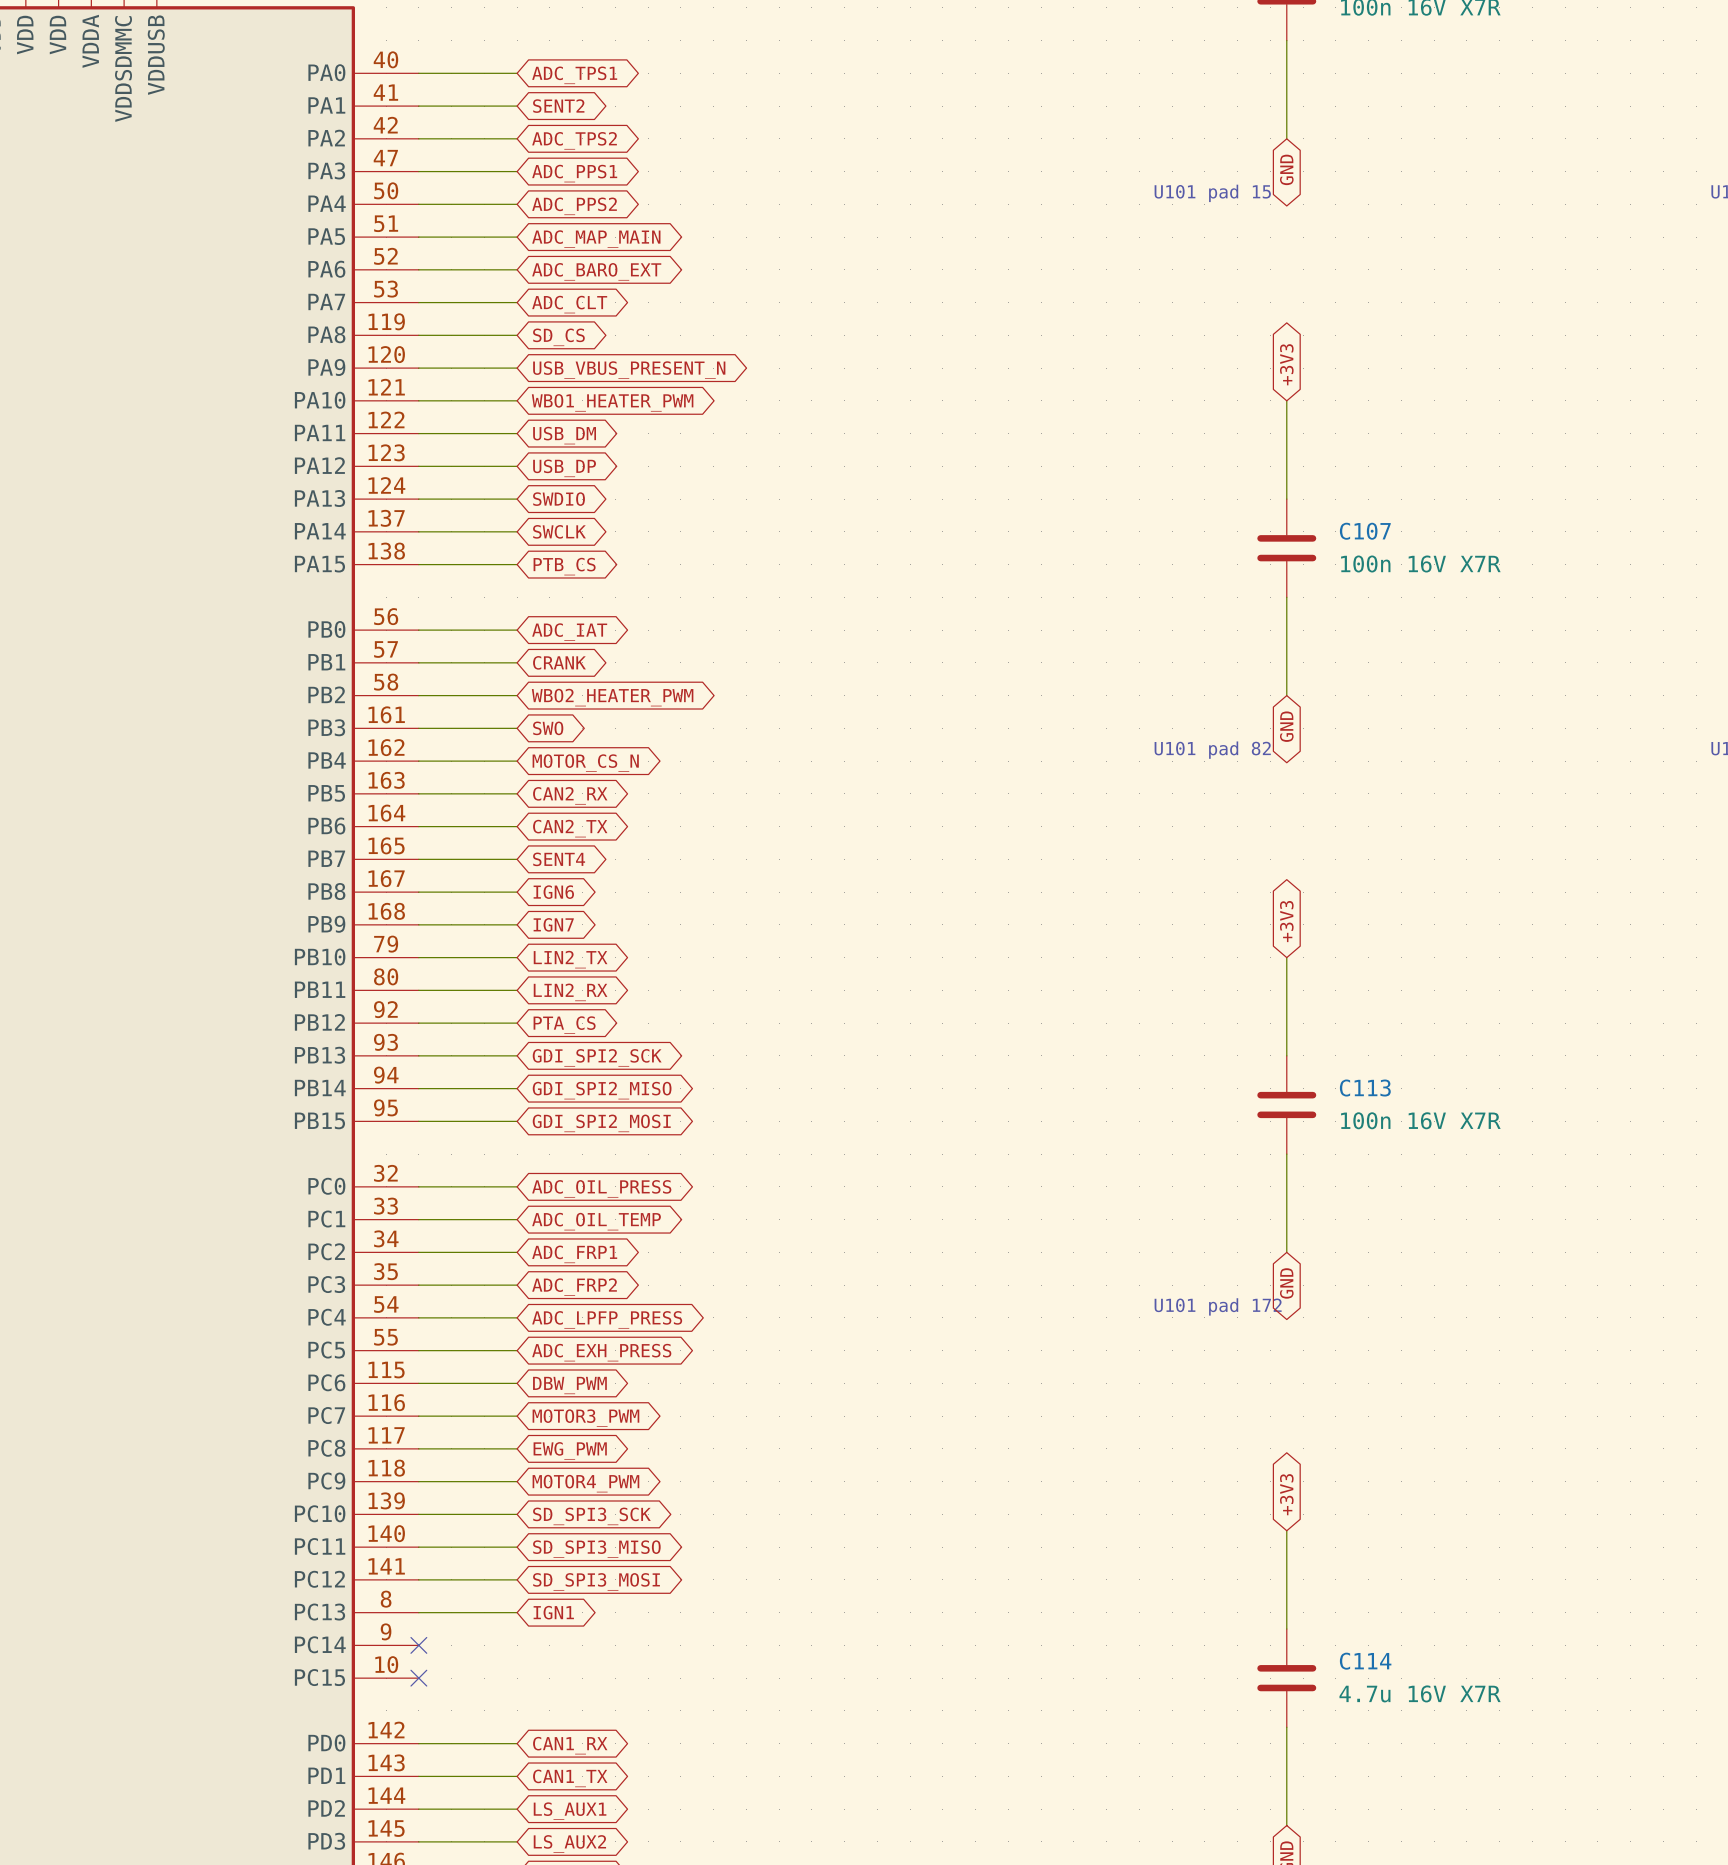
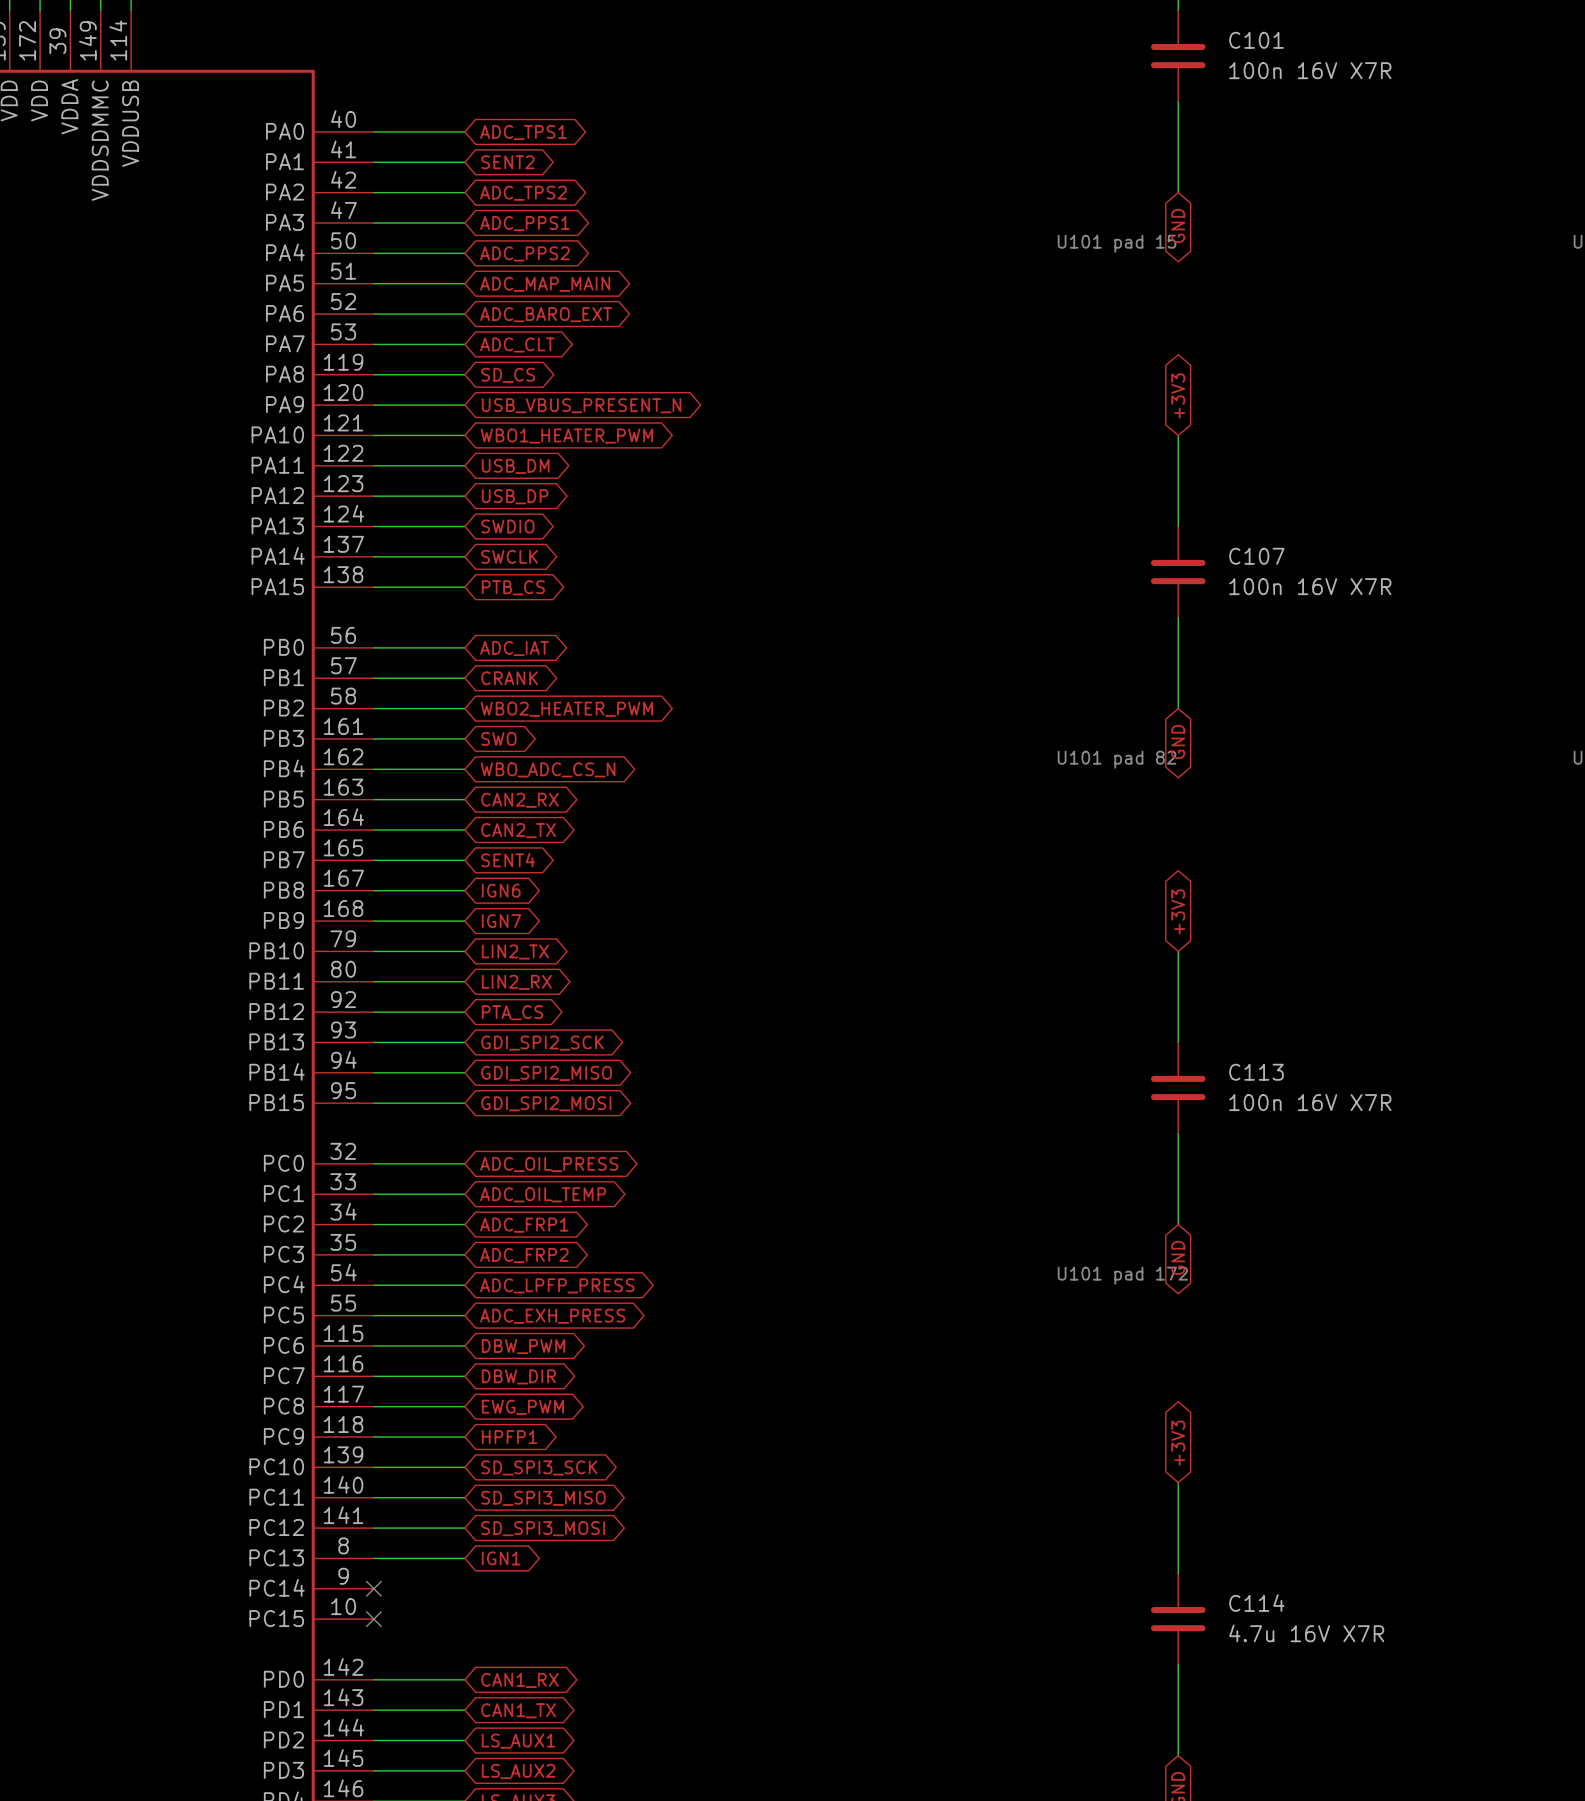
global label: MOTOR_CS_N (585, 763) -> WBO_ADC_CS_N (548, 769)
global label: MOTOR3_PWM (585, 1418) -> DBW_DIR (518, 1376)
global label: MOTOR4_PWM (585, 1483) -> HPFP1 (509, 1437)

